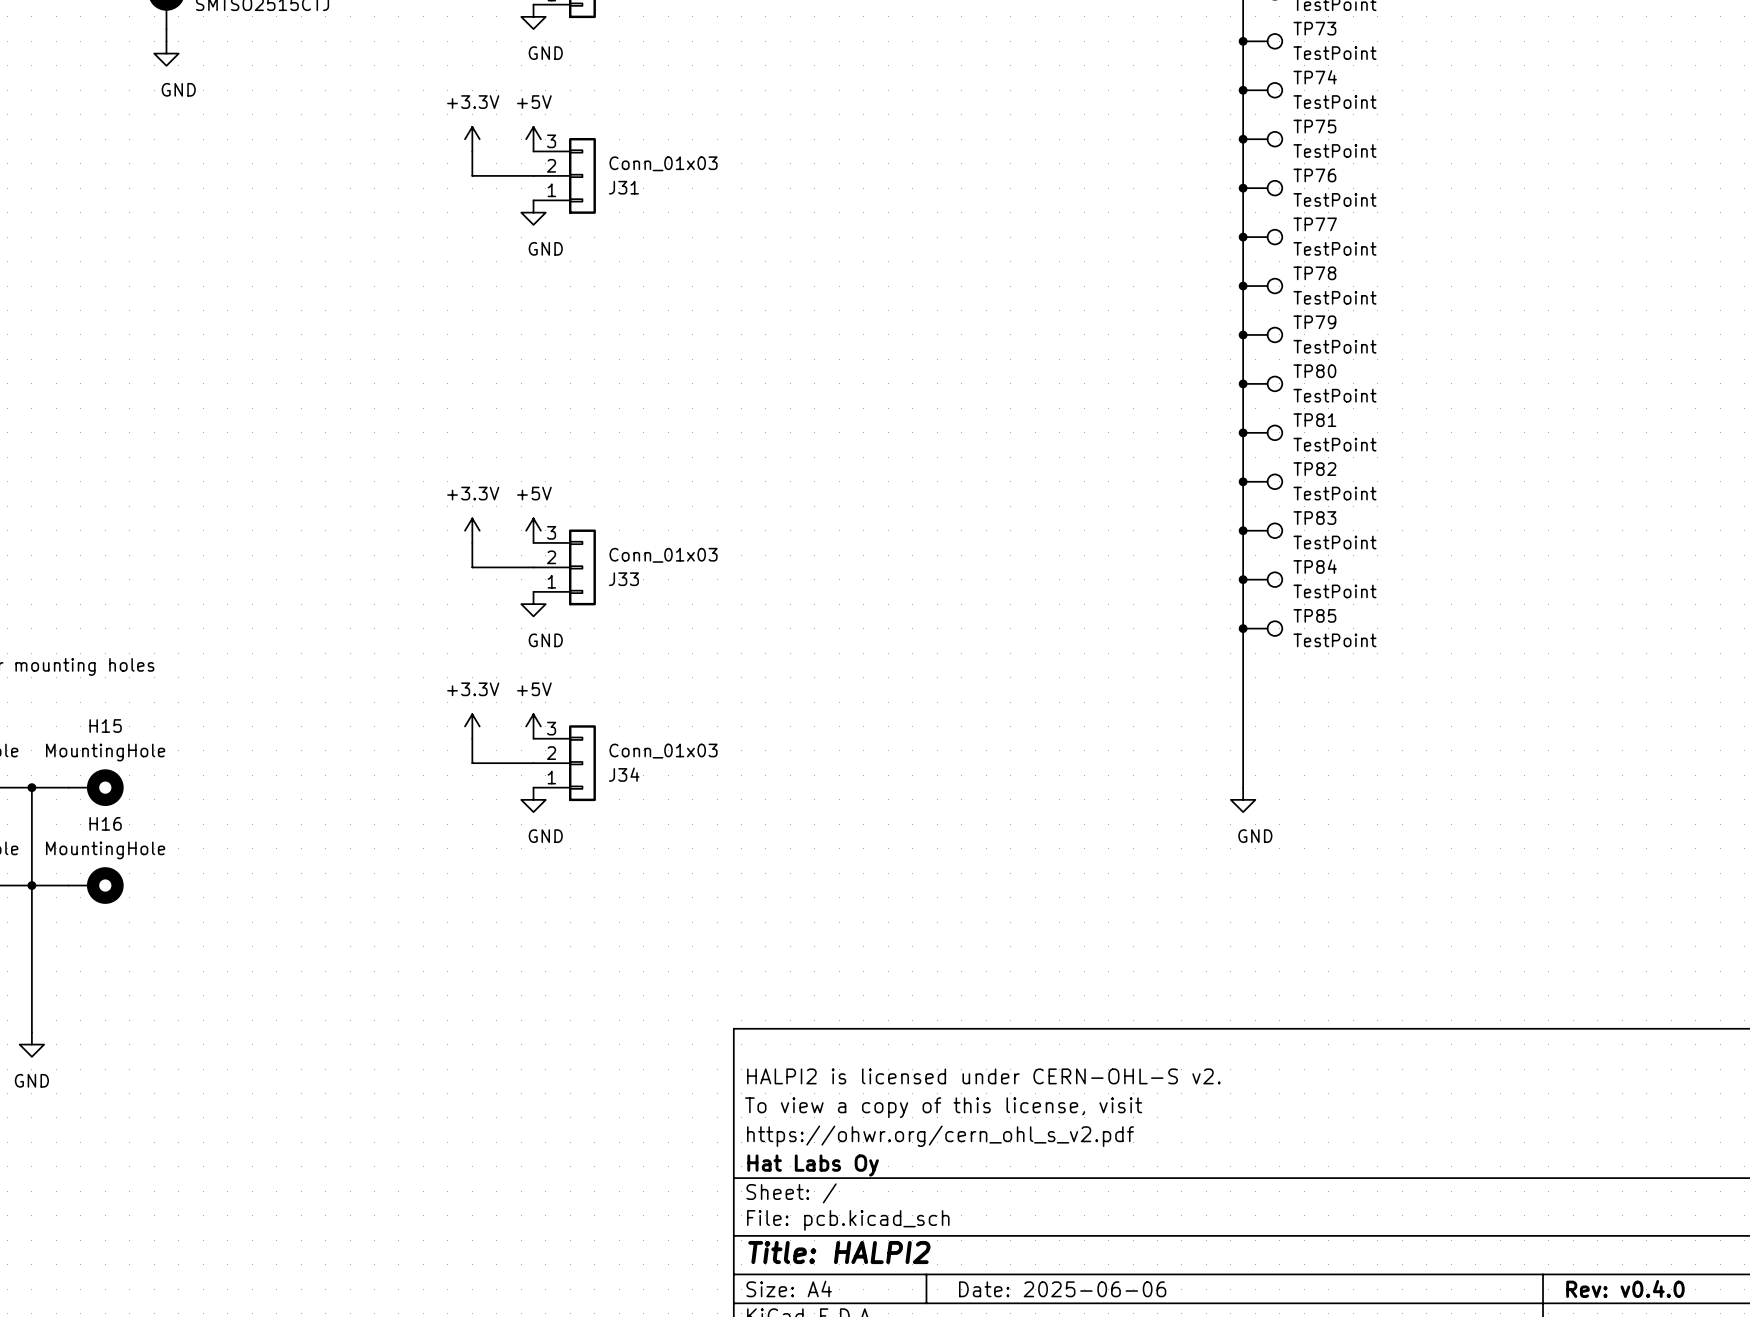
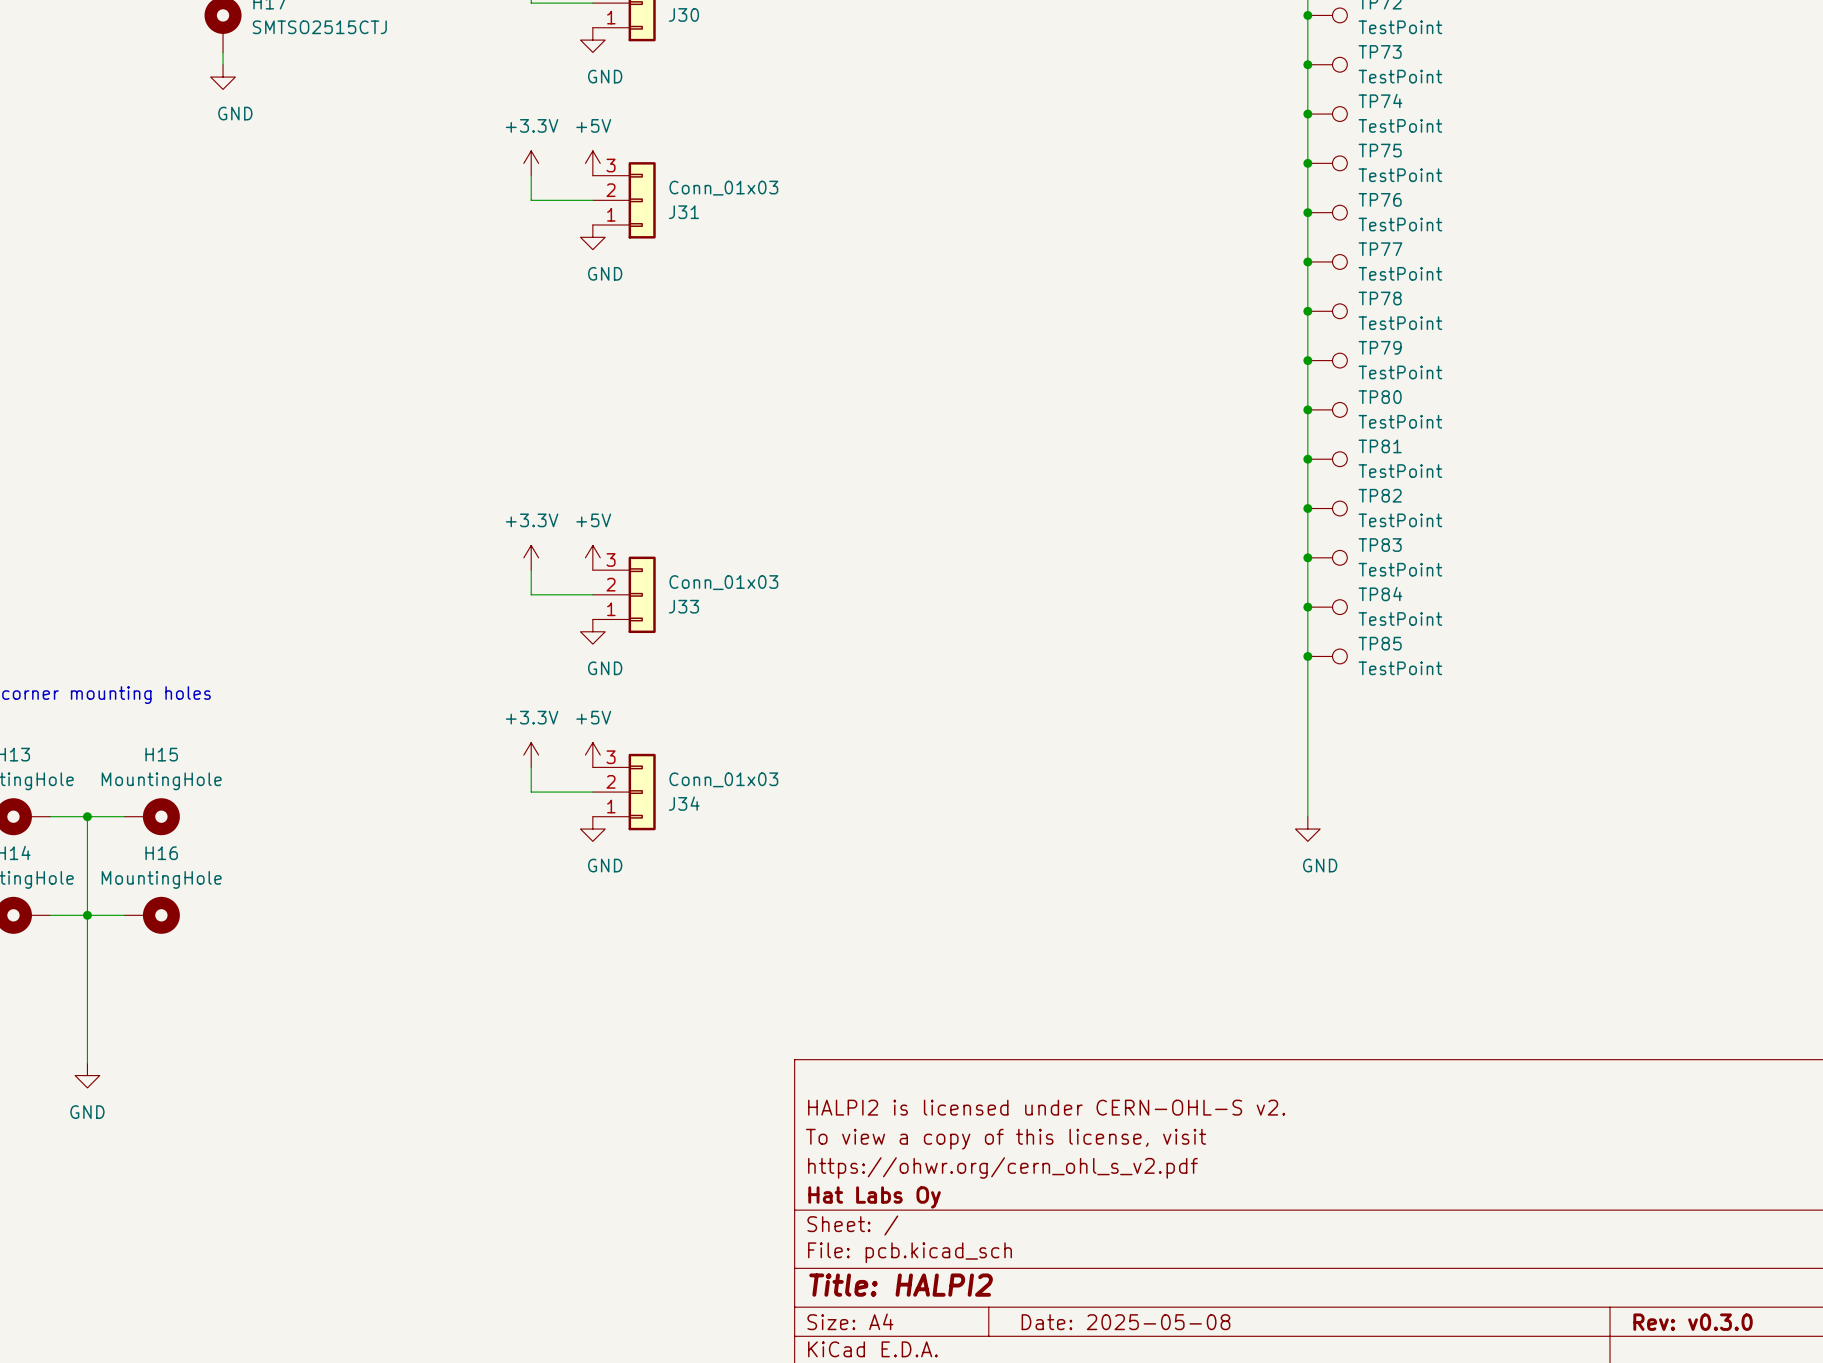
title block: Rev: v0.4.0 (1625, 1288) -> Rev: v0.3.0 (1693, 1322)
title block: Date: 2025-06-06 (1062, 1289) -> Date: 2025-05-08 (1125, 1322)

